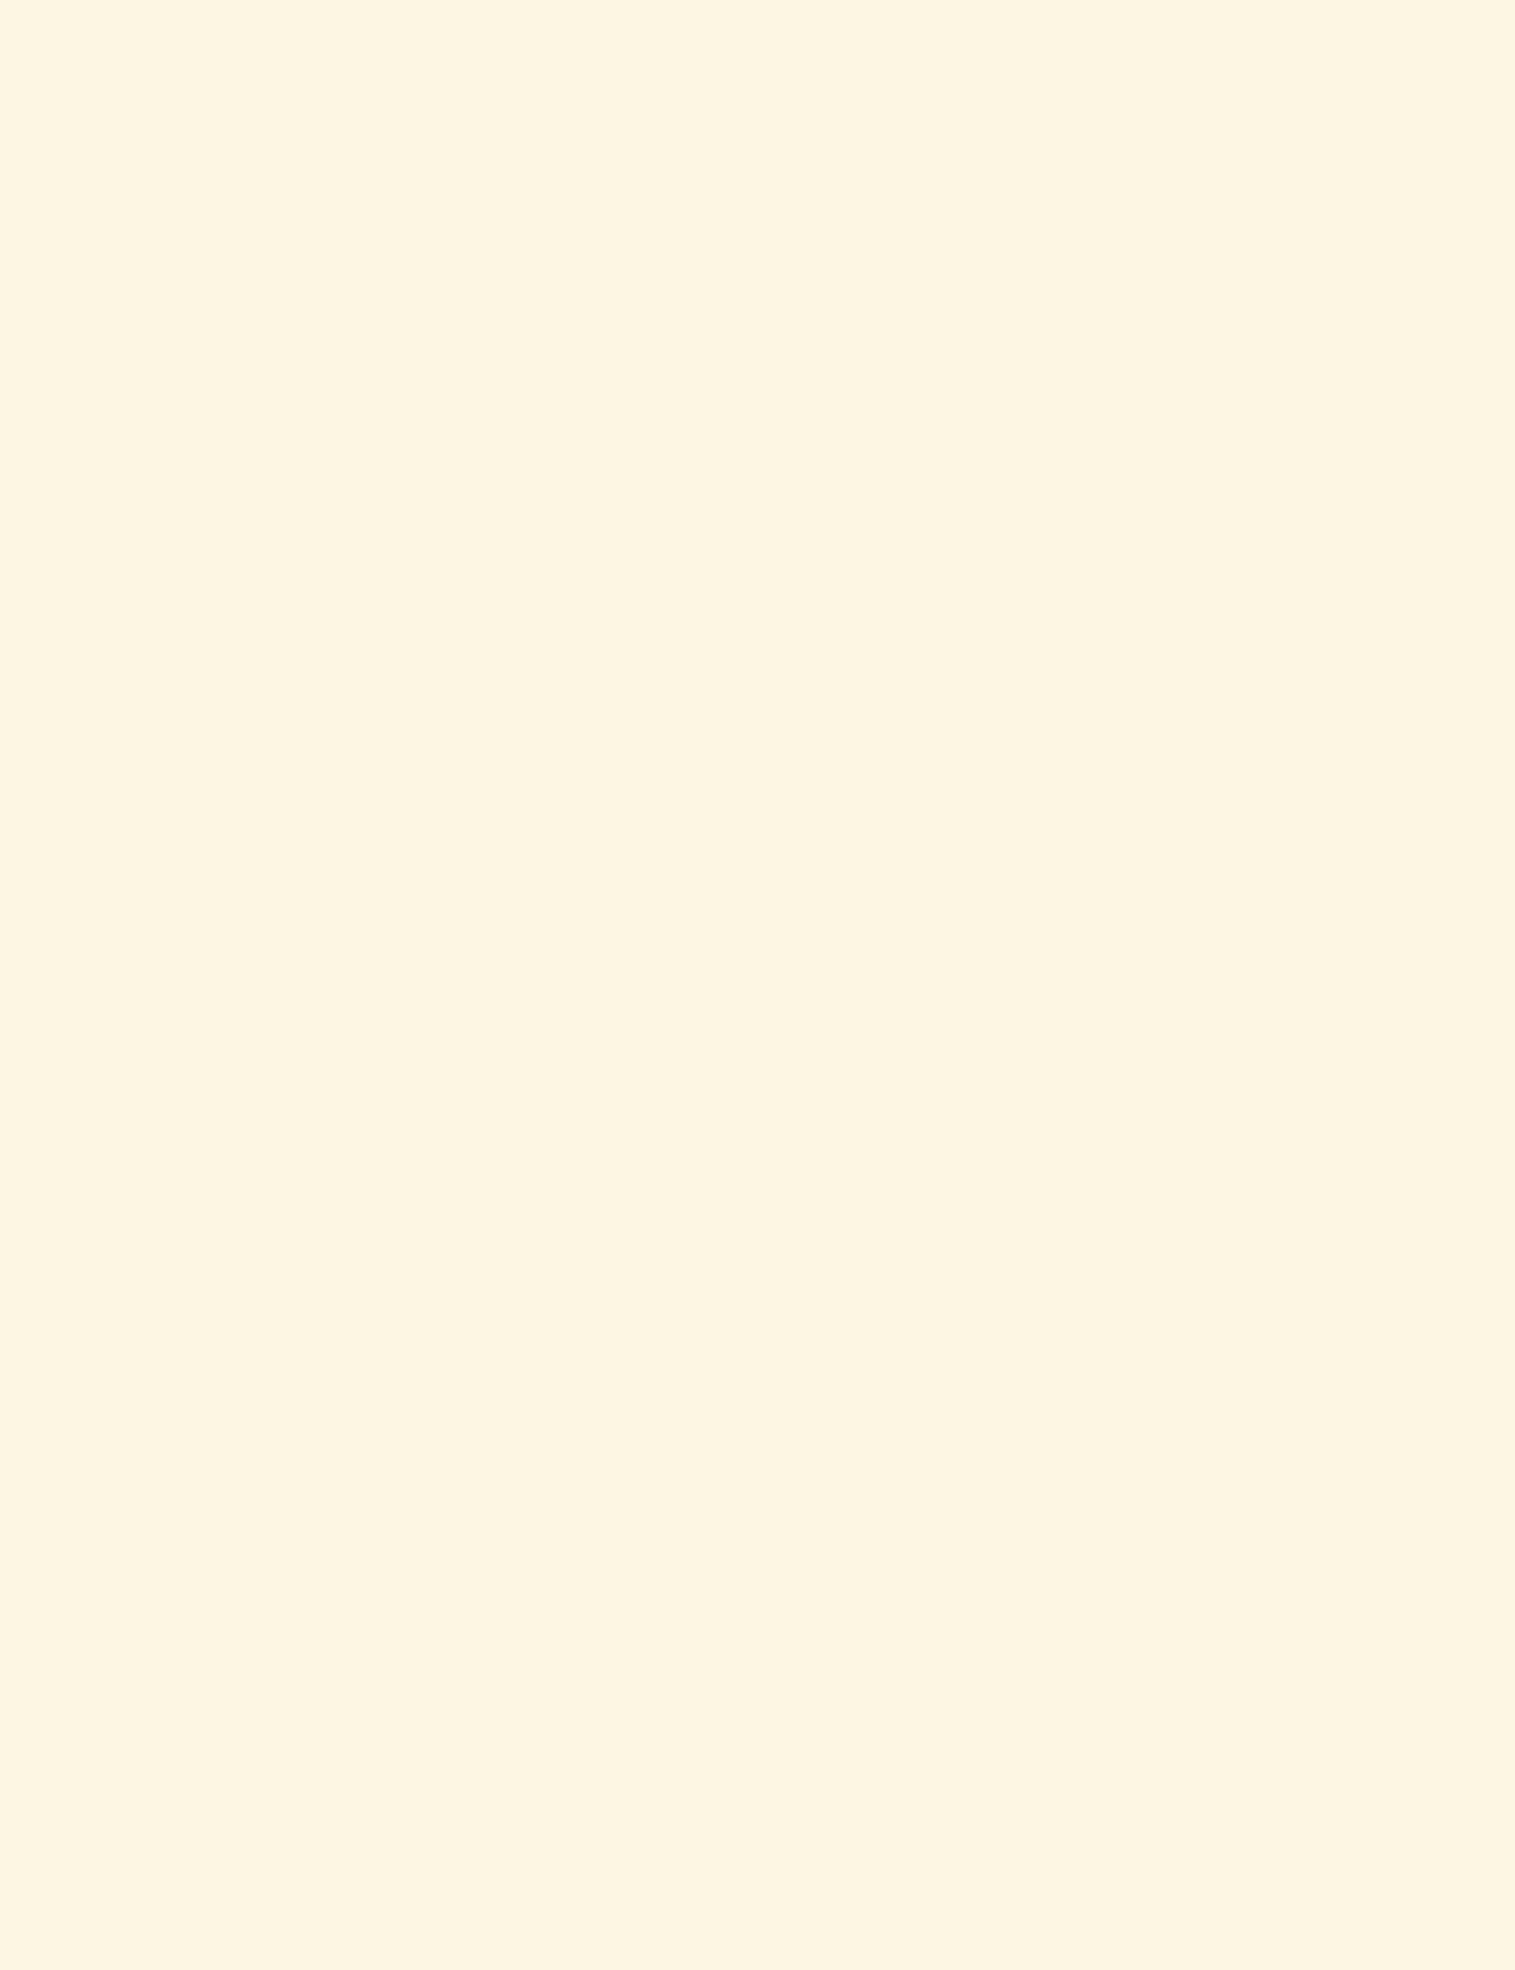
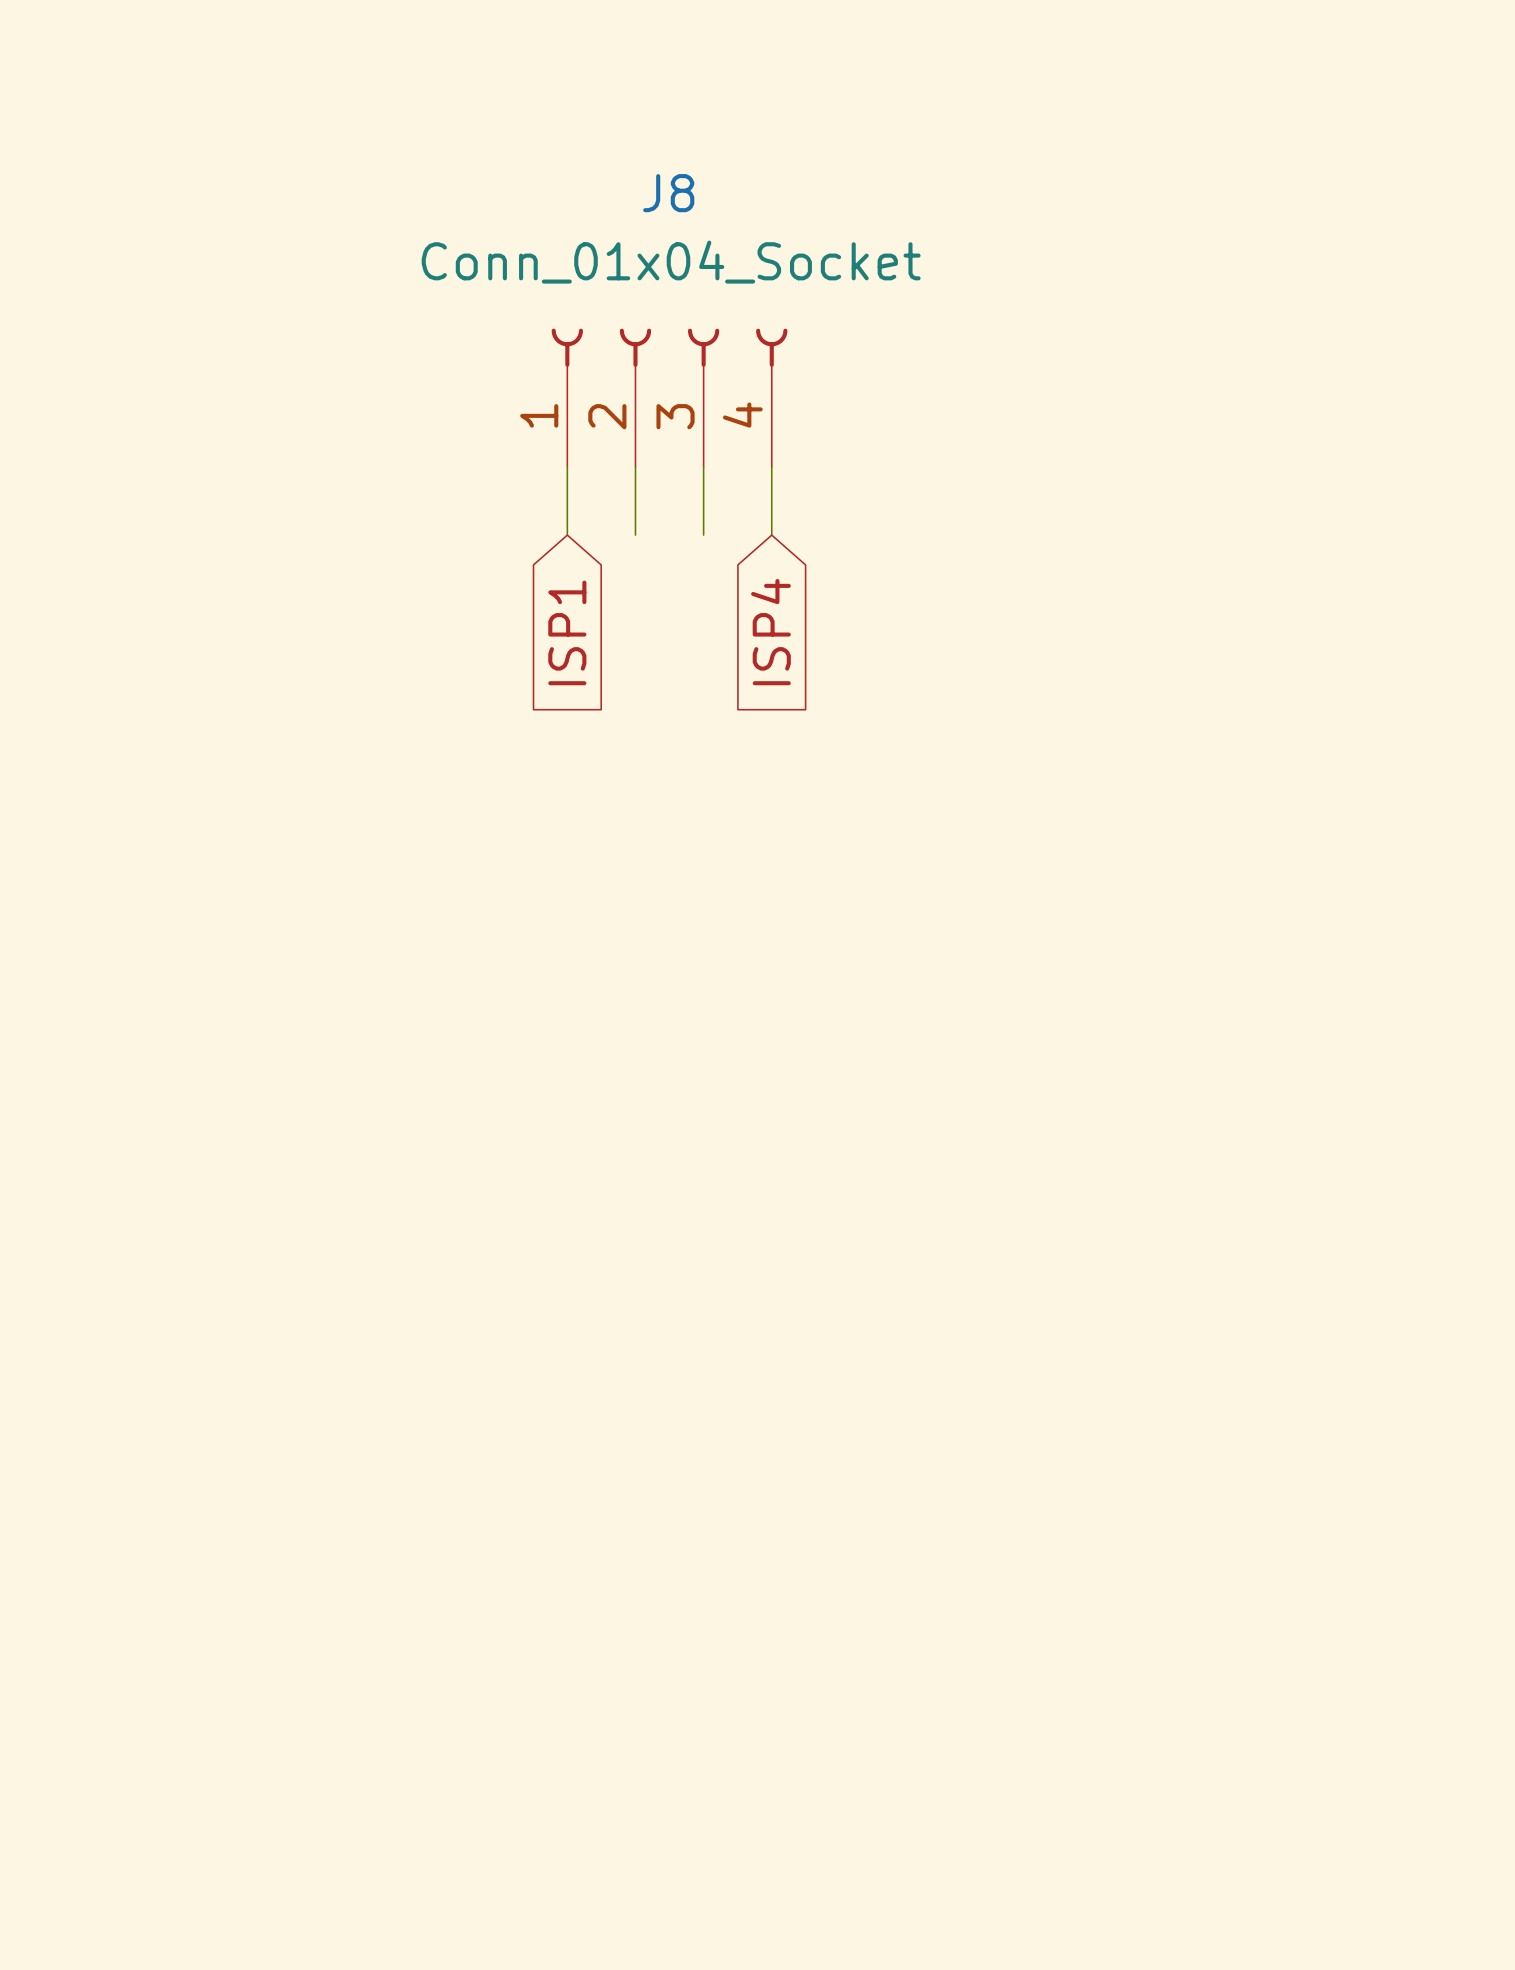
J8: none -> Conn_01x04_Socket (669, 397)
wire: none -> (567, 466) (567, 535)
wire: none -> (635, 466) (635, 535)
wire: none -> (703, 466) (703, 535)
wire: none -> (771, 466) (771, 535)
global label: none -> ISP1 (567, 632)
global label: none -> ISP4 (770, 632)

